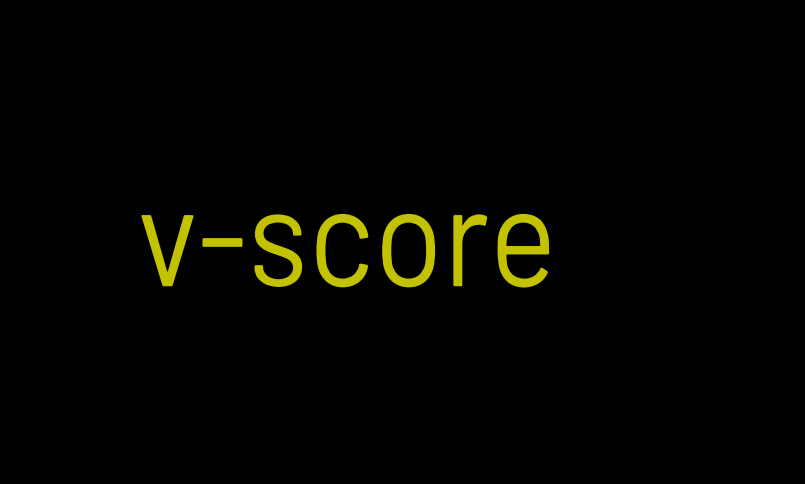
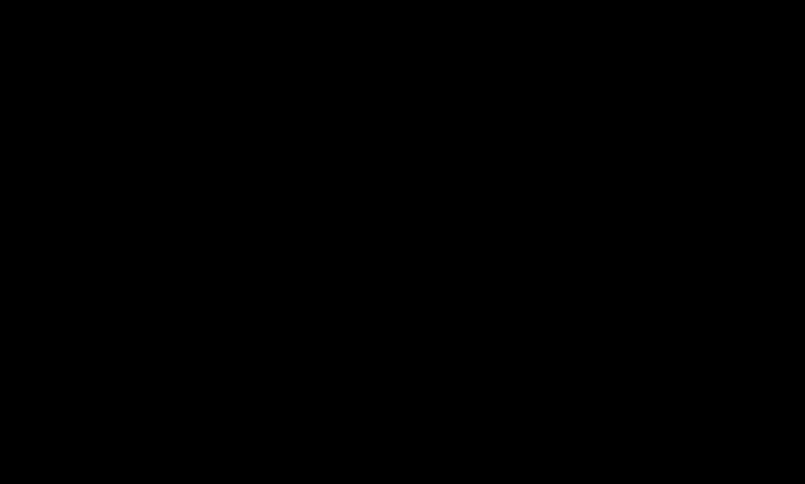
text: v-score (345, 250) -> none

